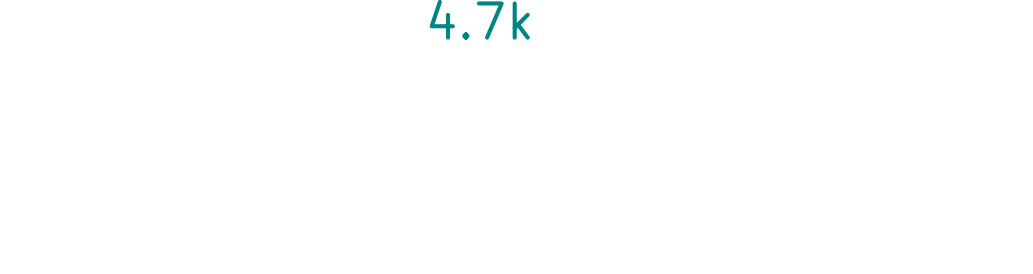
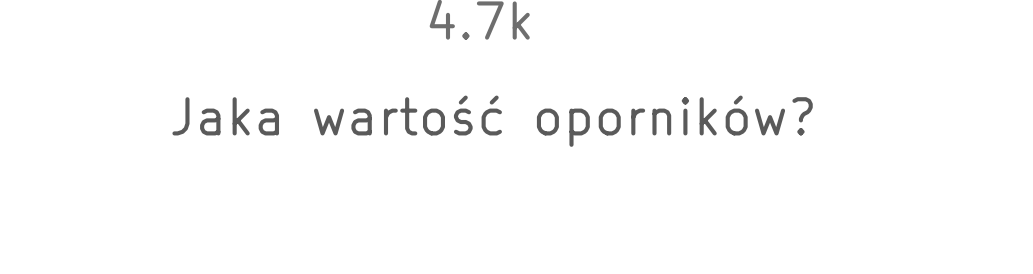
text: none -> Jaka wartość oporników? (492, 121)

